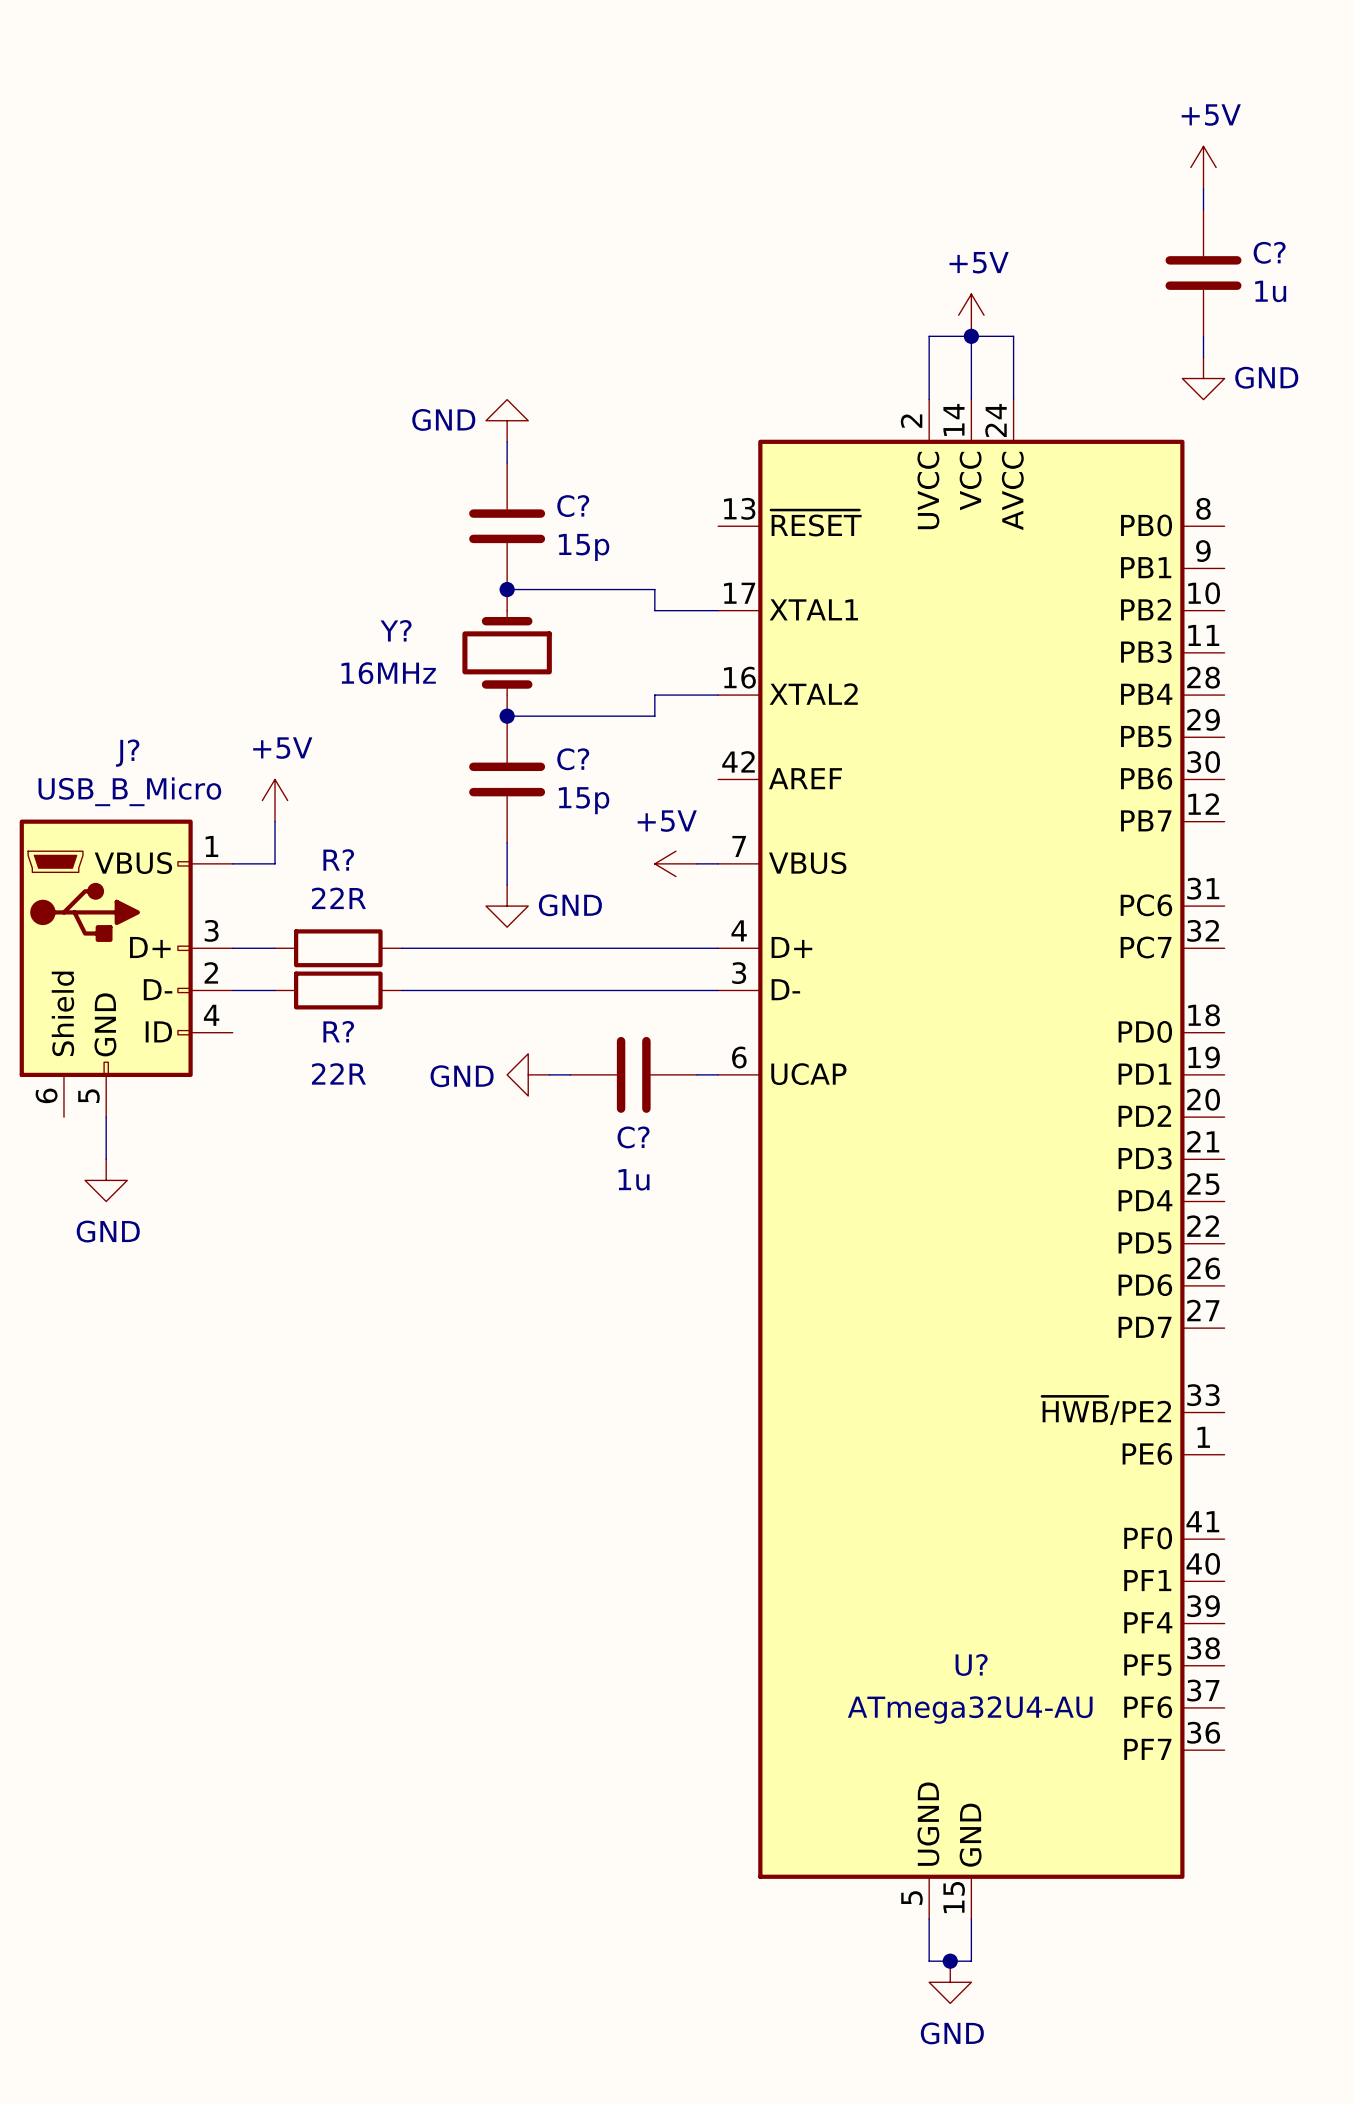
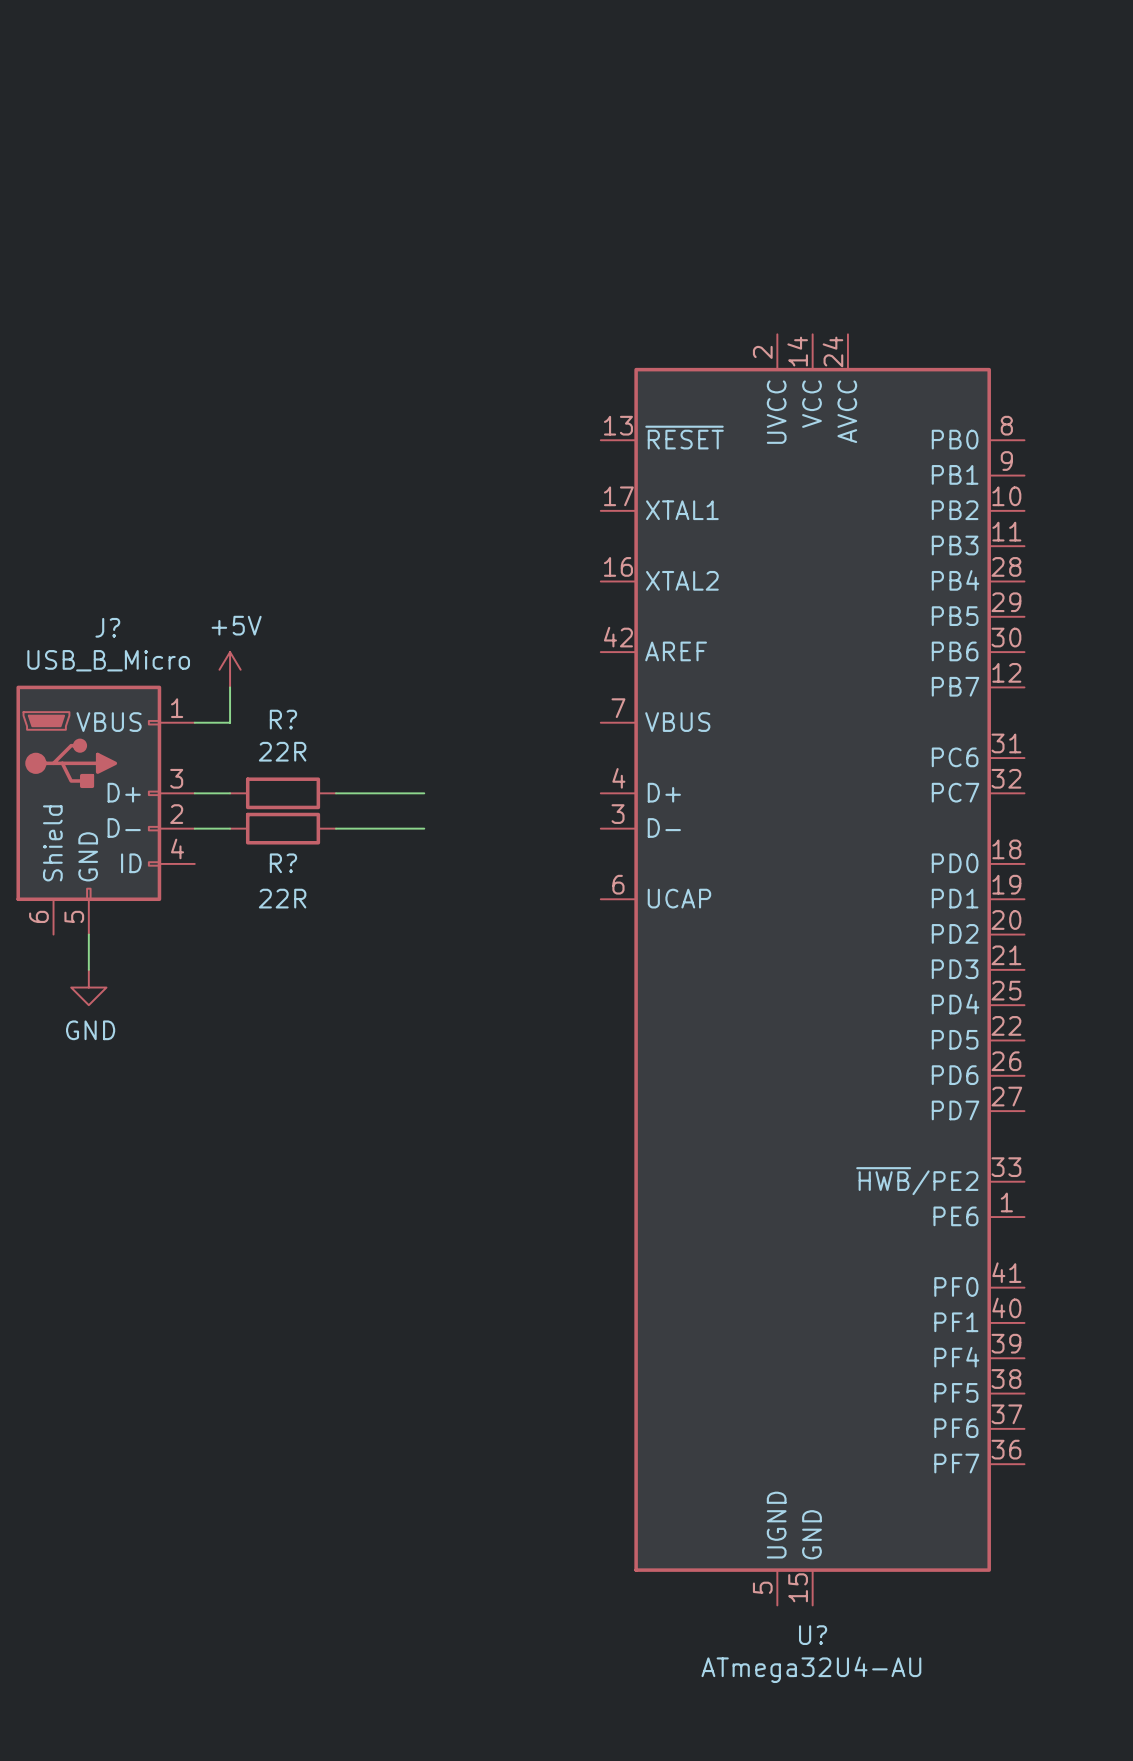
power symbol: +5V (1203, 167) -> none
wire: (1203, 188) (1203, 209) -> none
C?: 1u (1203, 273) -> none
power symbol: +5V (971, 315) -> none
wire: (971, 336) (971, 399) -> none
junction: (971, 336) -> none
wire: (1203, 336) (1203, 357) -> none
power symbol: GND (1203, 378) -> none
wire: (929, 399) (929, 336) (1013, 336) (1013, 399) -> none
power symbol: GND (507, 420) -> none
wire: (507, 441) (507, 462) -> none
C?: 15p (507, 526) -> none
wire: (507, 589) (654, 589) (654, 610) (718, 610) -> none
junction: (507, 589) -> none
Y?: 16MHz (507, 652) -> none
wire: (718, 695) (654, 695) (654, 716) (507, 716) -> none
junction: (507, 716) -> none
C?: 15p (507, 779) -> none
wire: (507, 842) (507, 884) -> none
power symbol: +5V (675, 863) -> none
wire: (697, 863) (718, 863) -> none
power symbol: GND (507, 906) -> none
wire: (507, 948) (718, 948) -> none
wire: (507, 990) (718, 990) -> none
power symbol: GND (528, 1074) -> none
wire: (549, 1074) (570, 1074) -> none
C?: 1u (633, 1074) -> none
wire: (697, 1074) (718, 1074) -> none
U? name position: U? (971, 1664) -> U? (813, 1635)
U? value position: ATmega32U4-AU (970, 1709) -> ATmega32U4-AU (811, 1669)
wire: (929, 1918) (929, 1961) (971, 1961) (971, 1918) -> none
junction: (950, 1961) -> none
power symbol: GND (950, 1982) -> none

